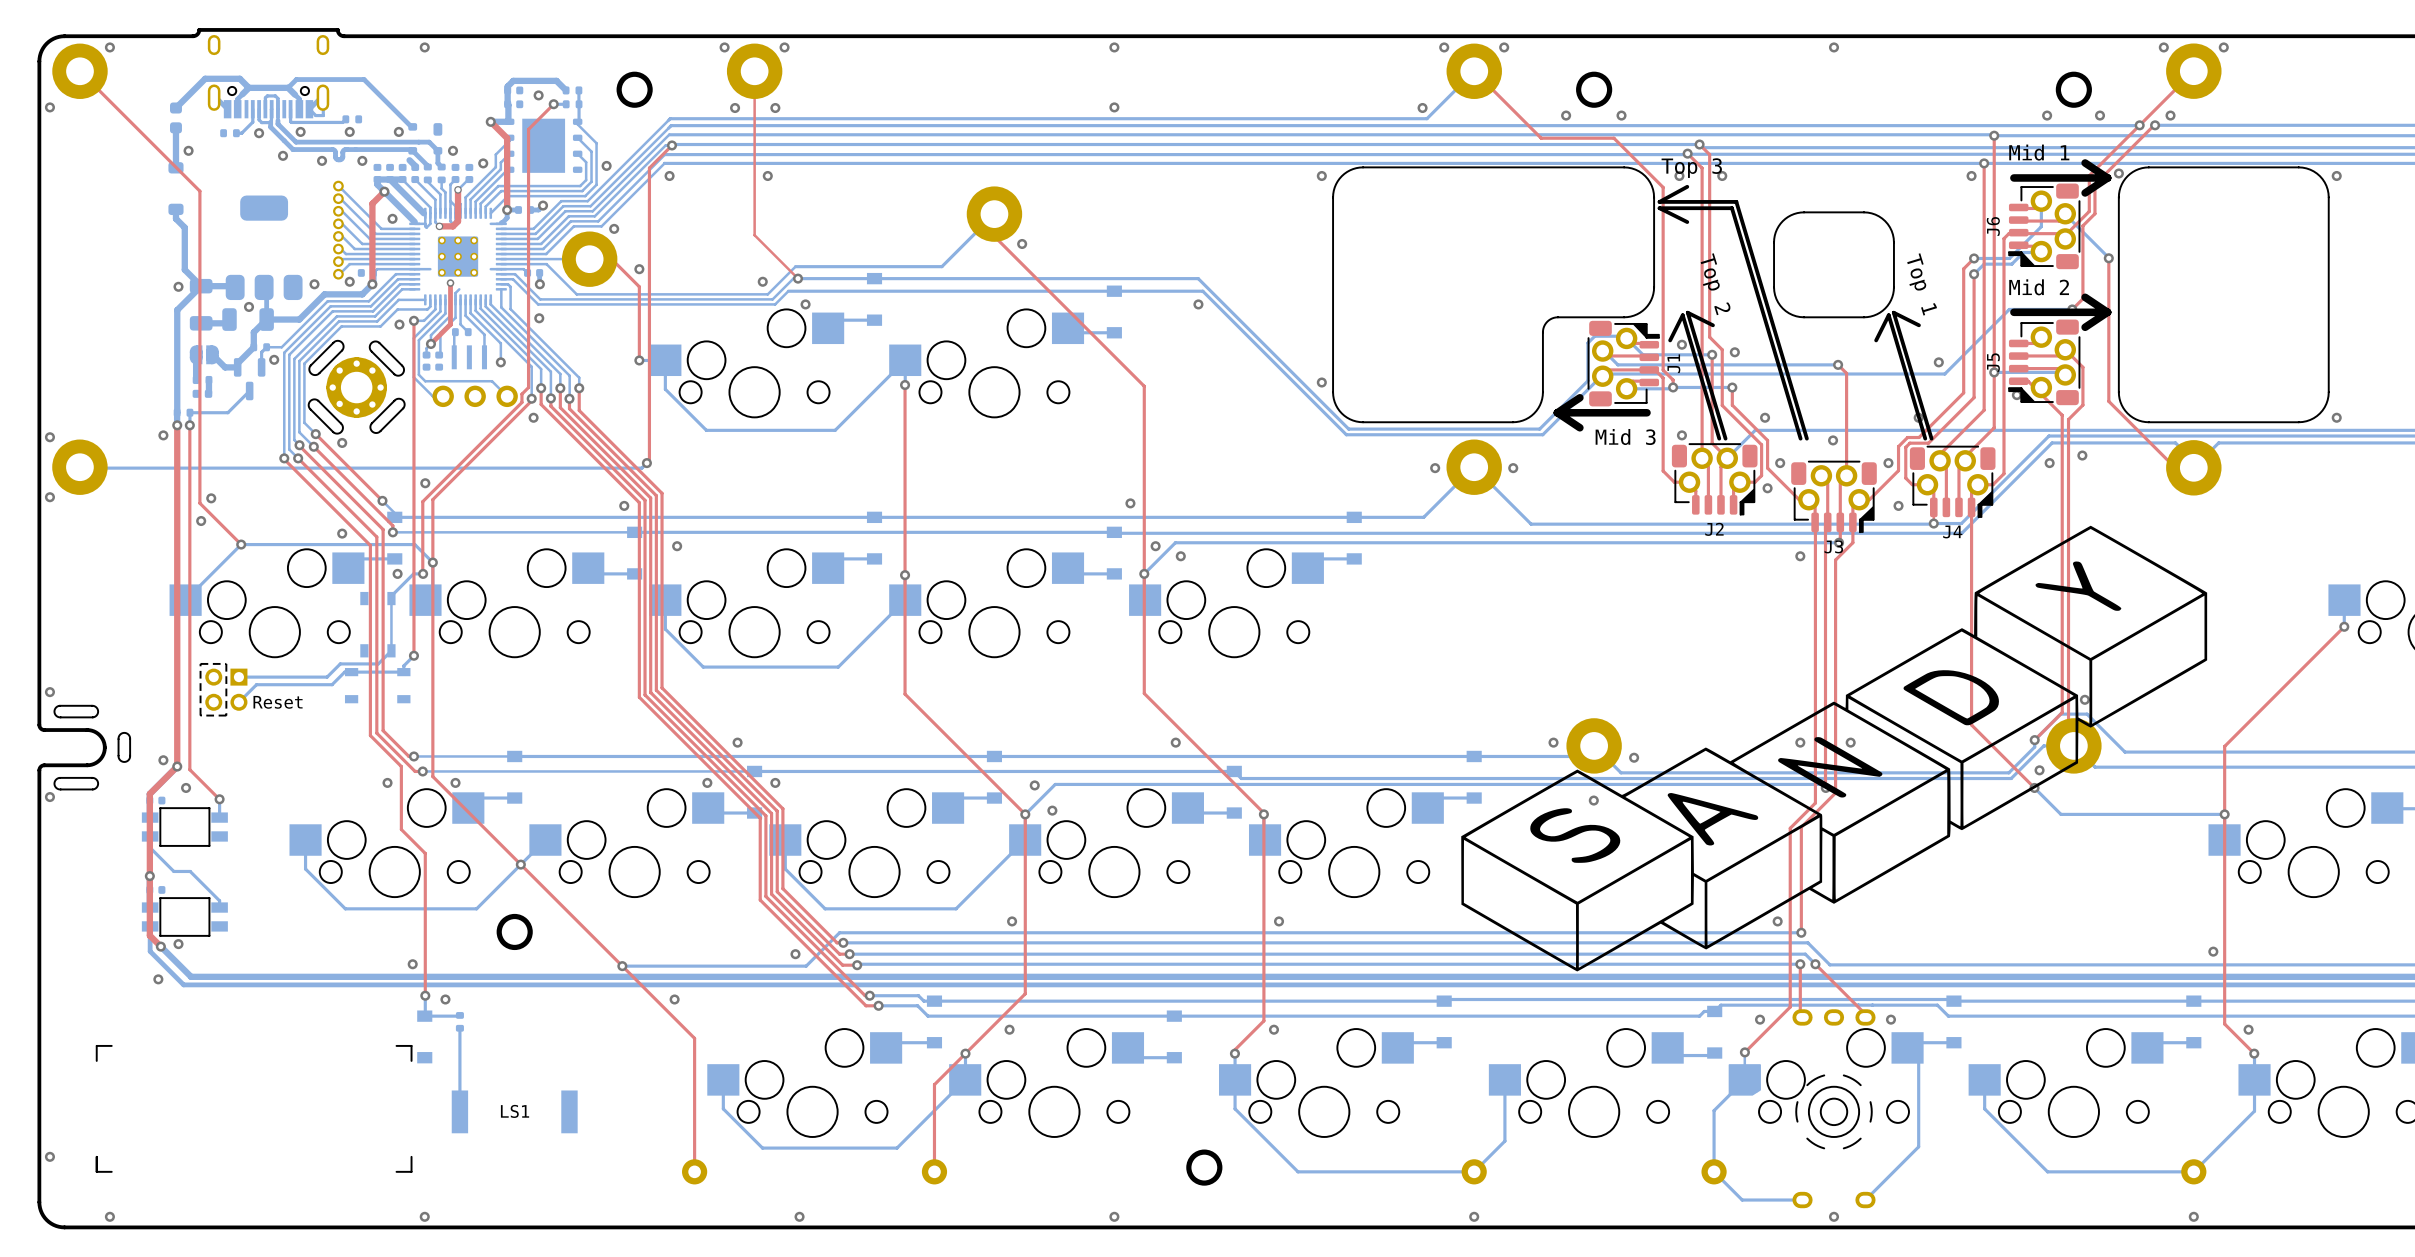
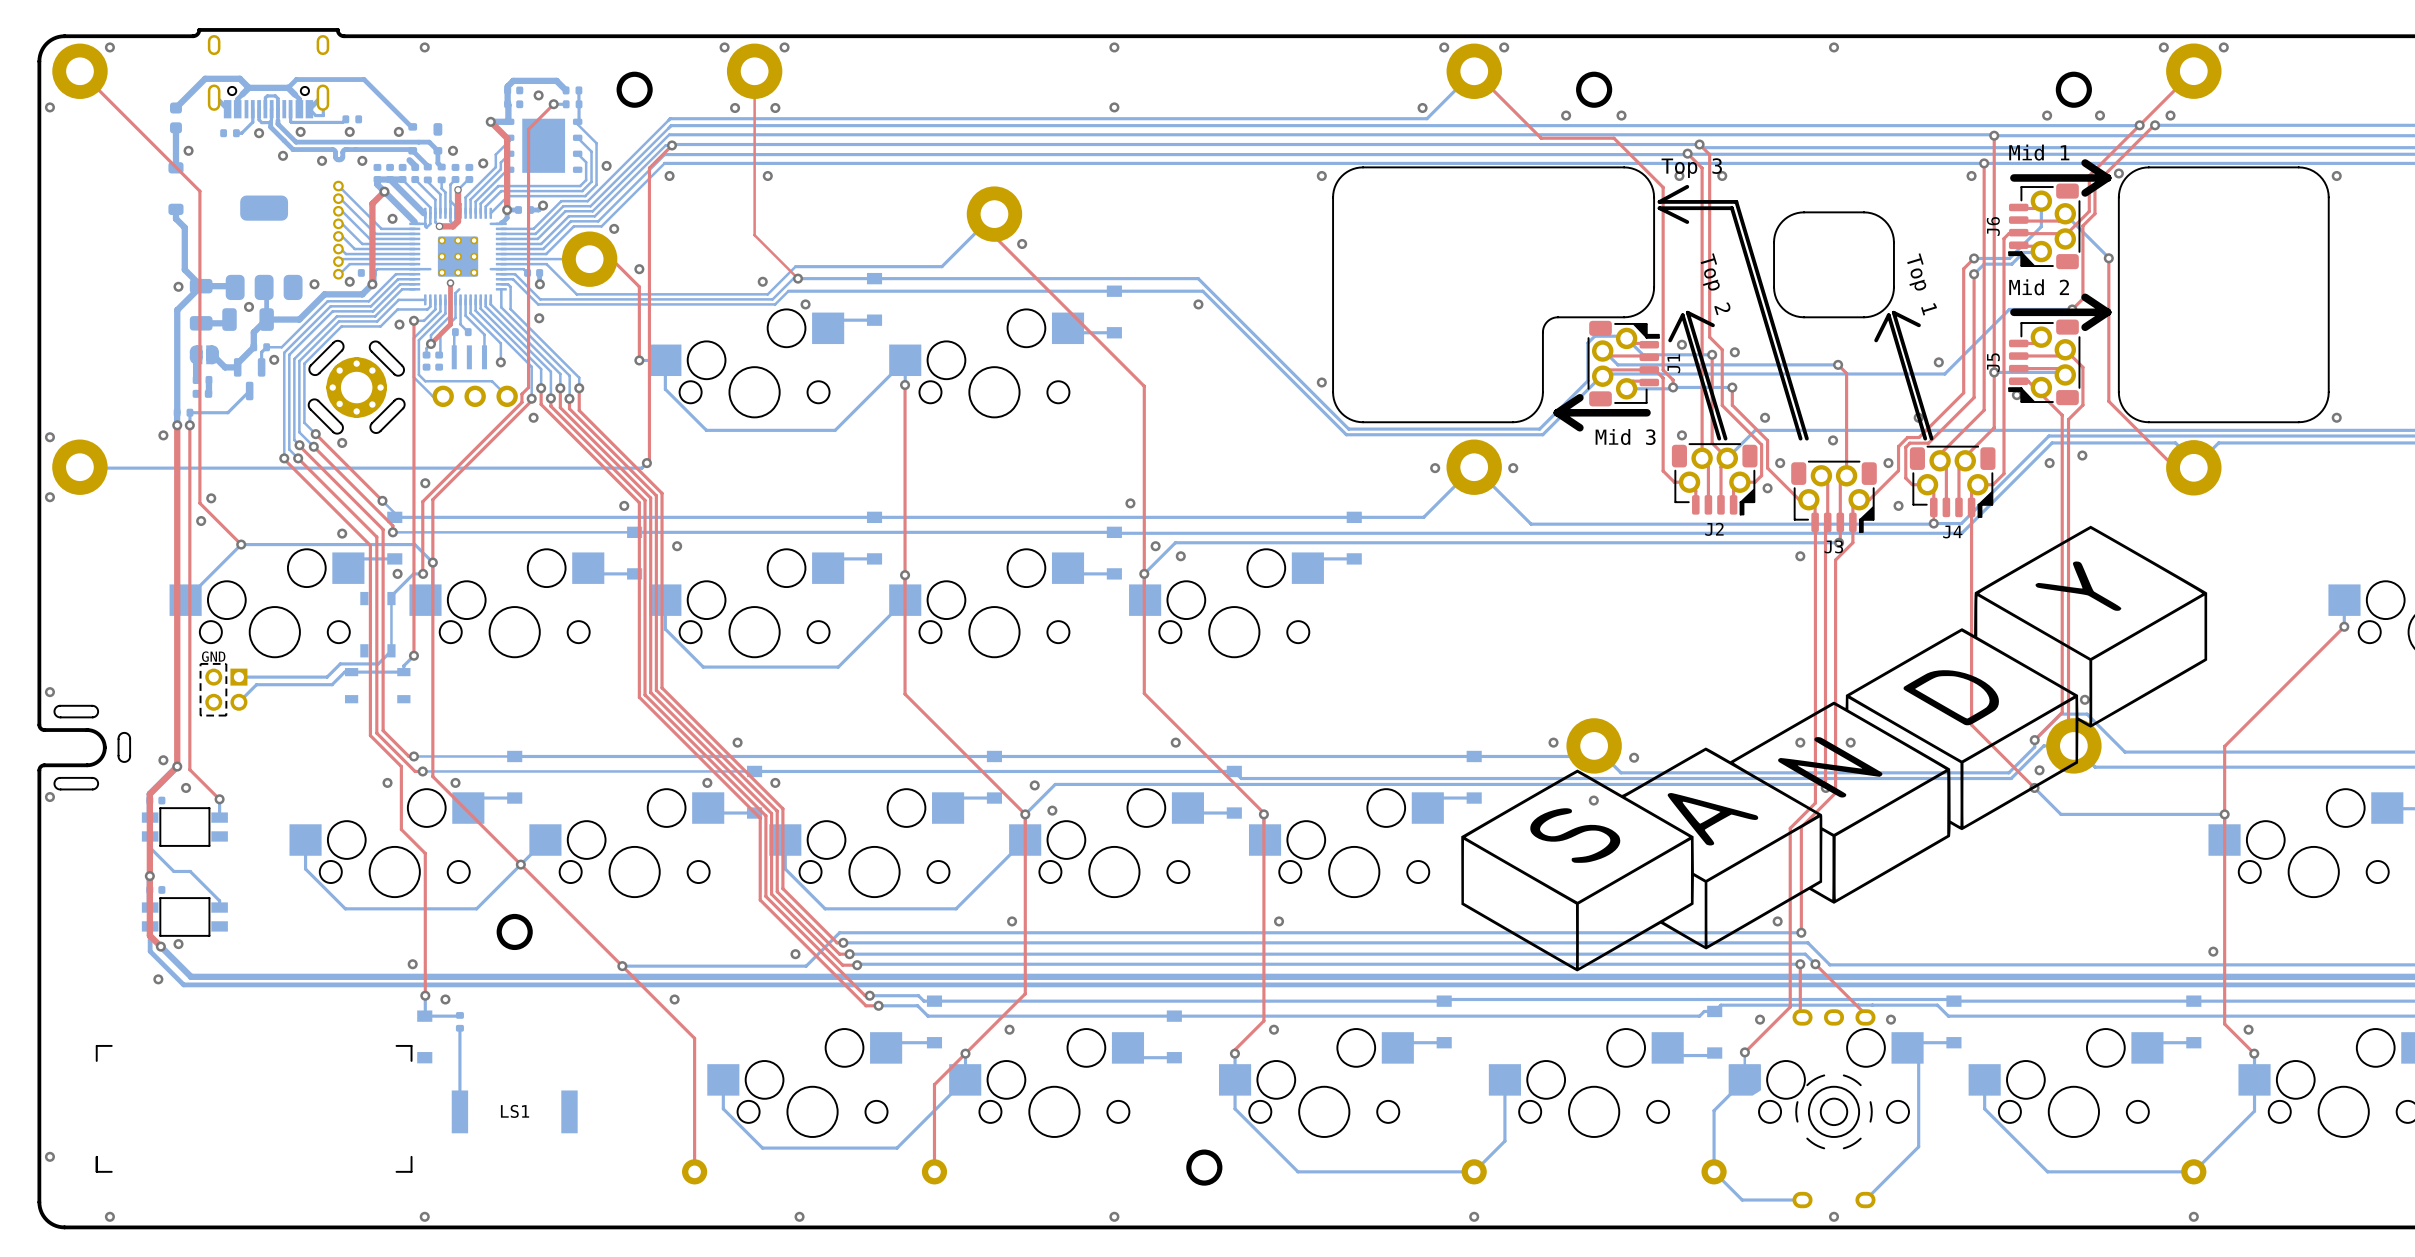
part text: Reset (278, 702) -> GND (213, 656)

